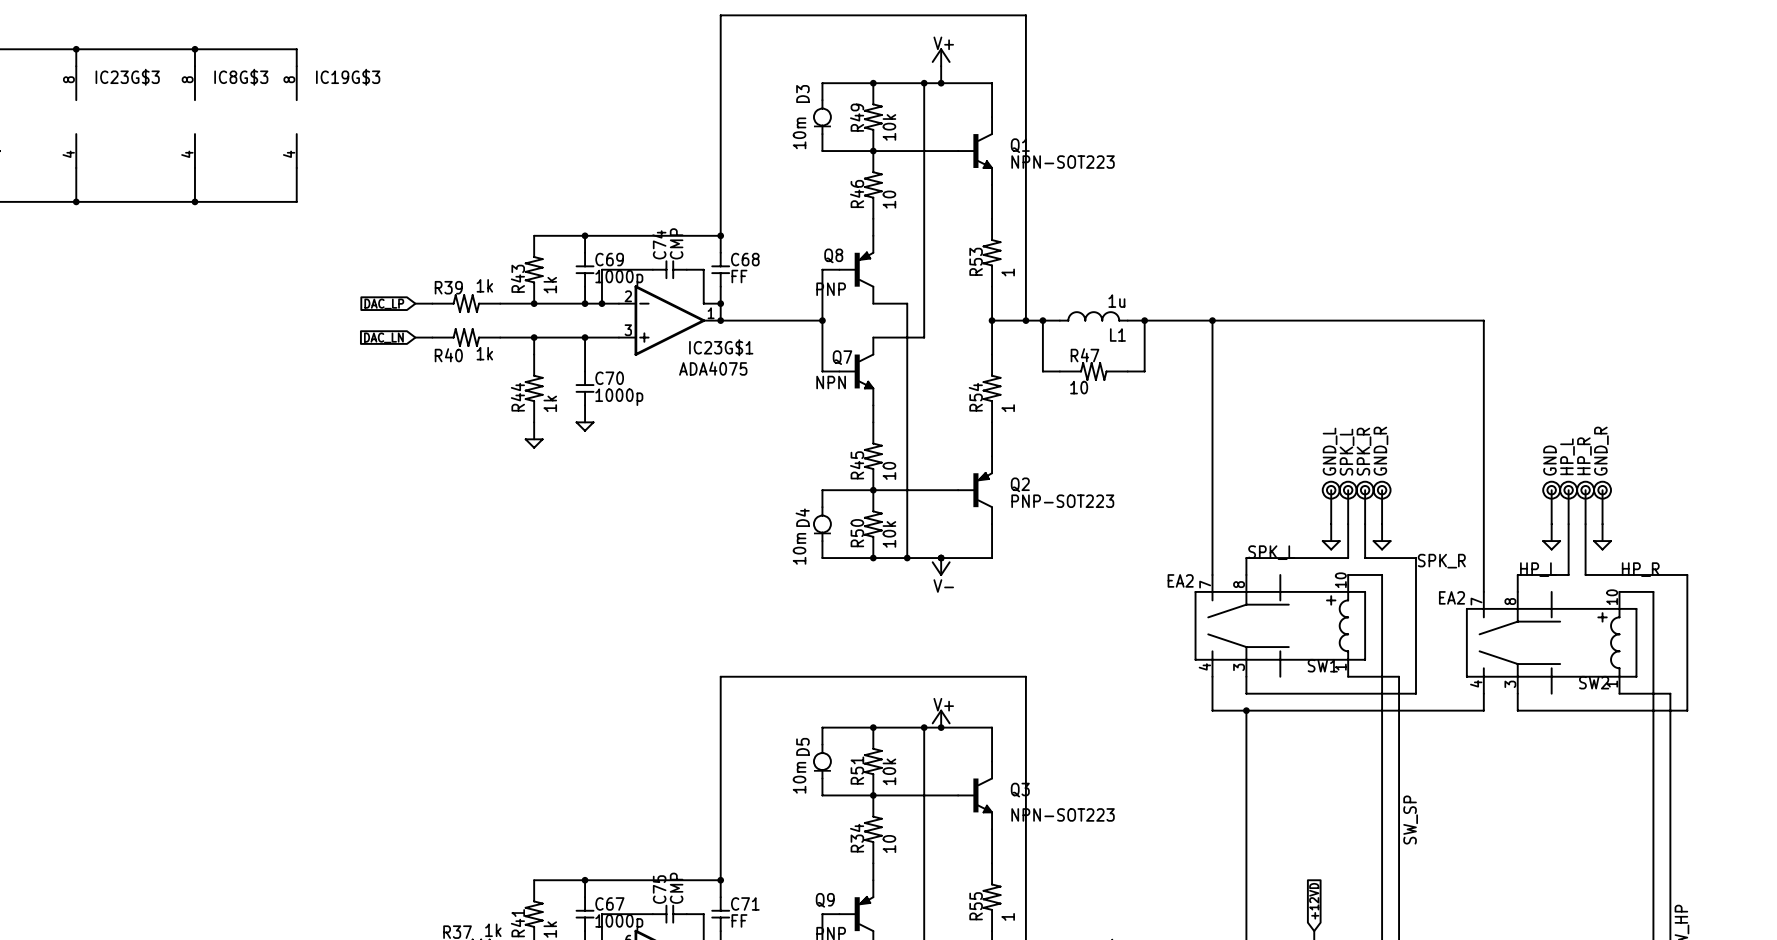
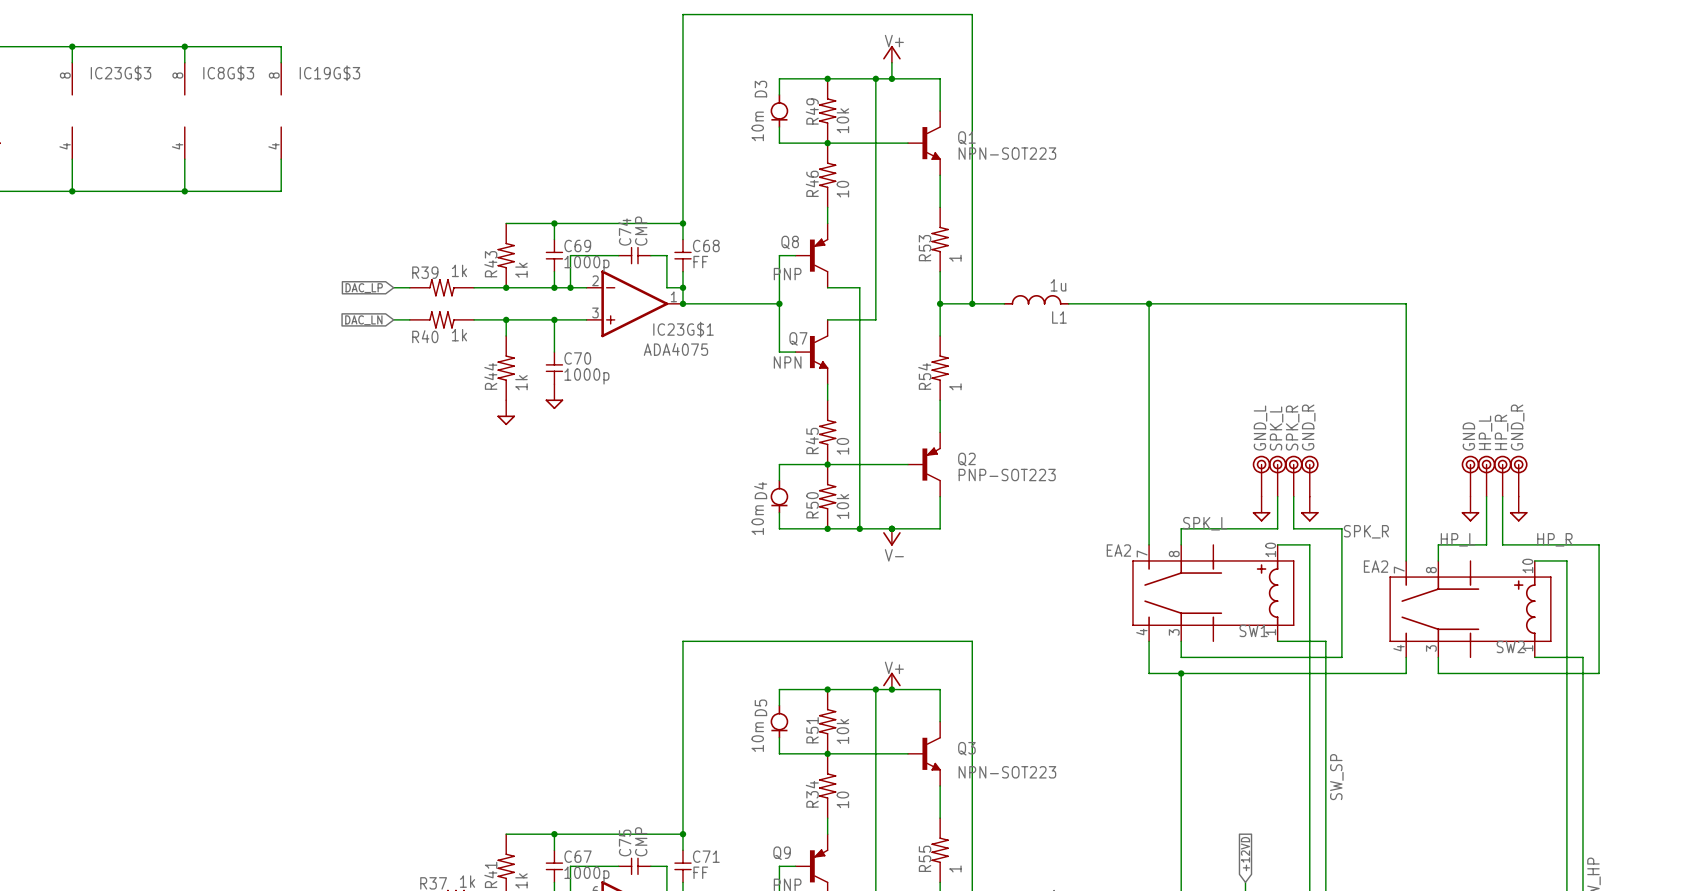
wire: (1042, 320) (1042, 371) (1059, 371) -> none
junction: (1042, 320) -> none
wire: (1144, 320) (1144, 371) (1127, 371) -> none
junction: (1144, 320) -> none
R47: 10 (1093, 371) -> none

